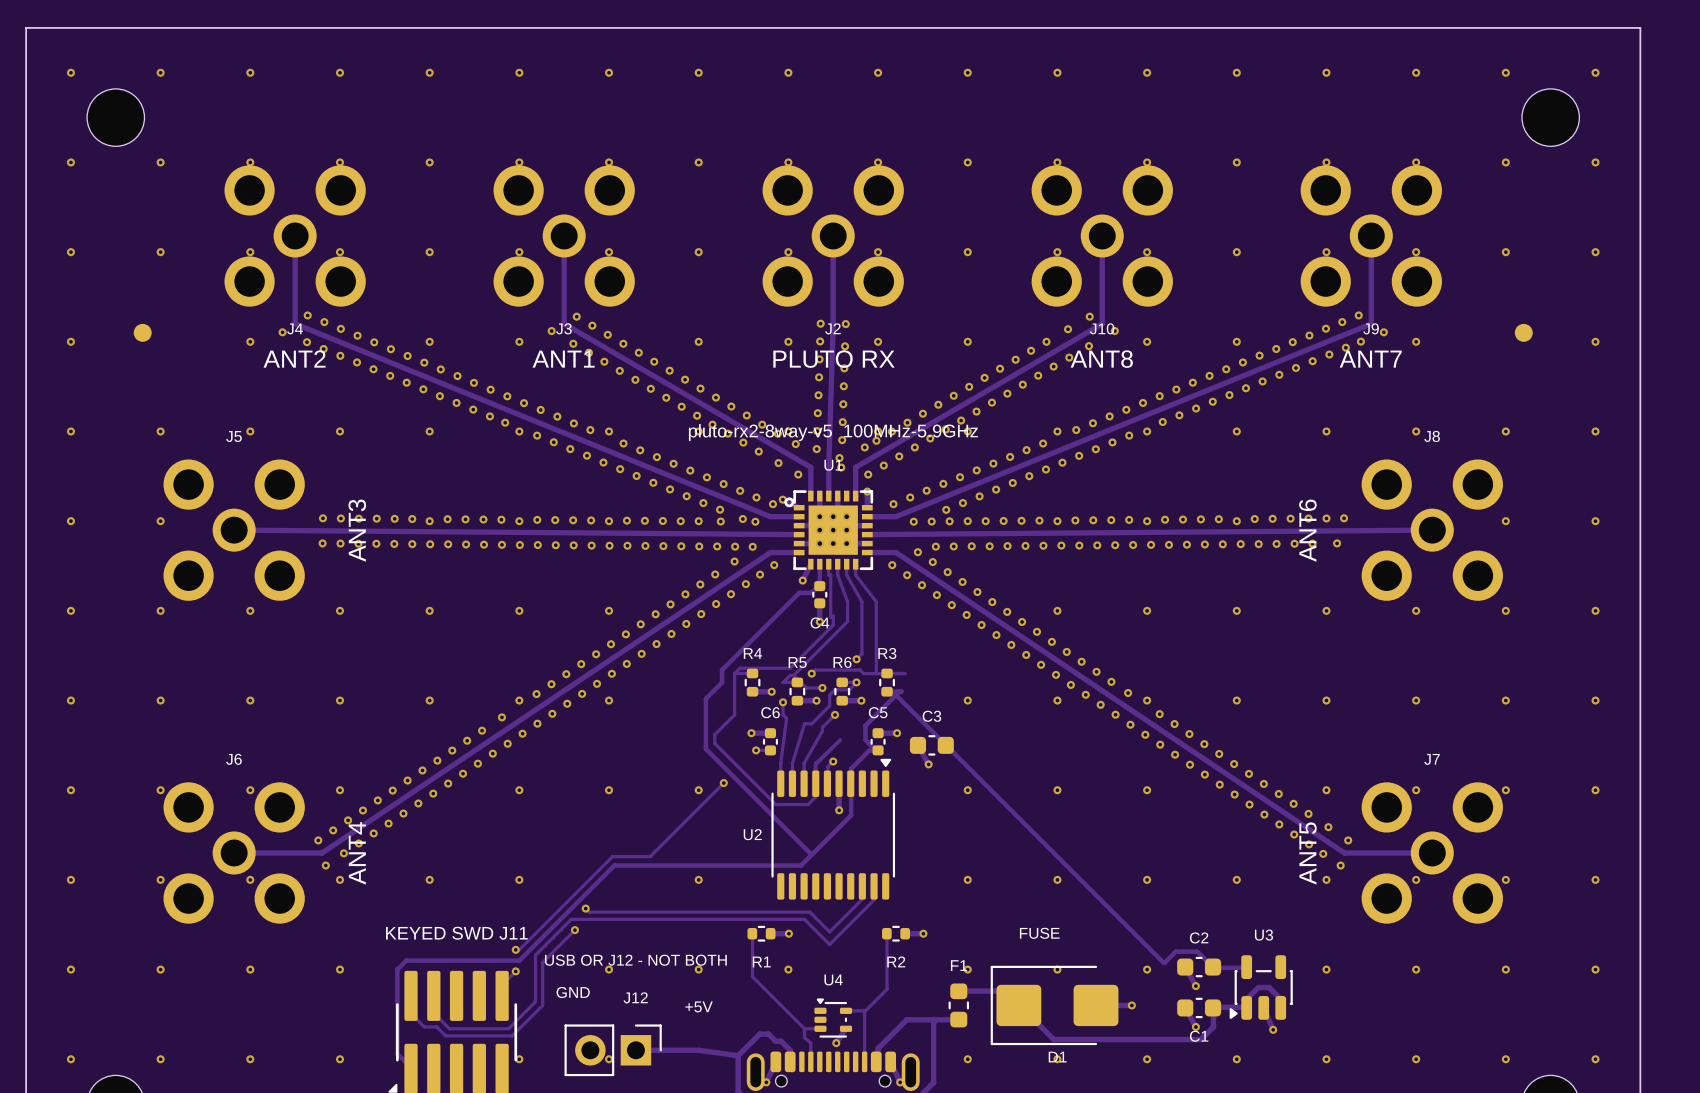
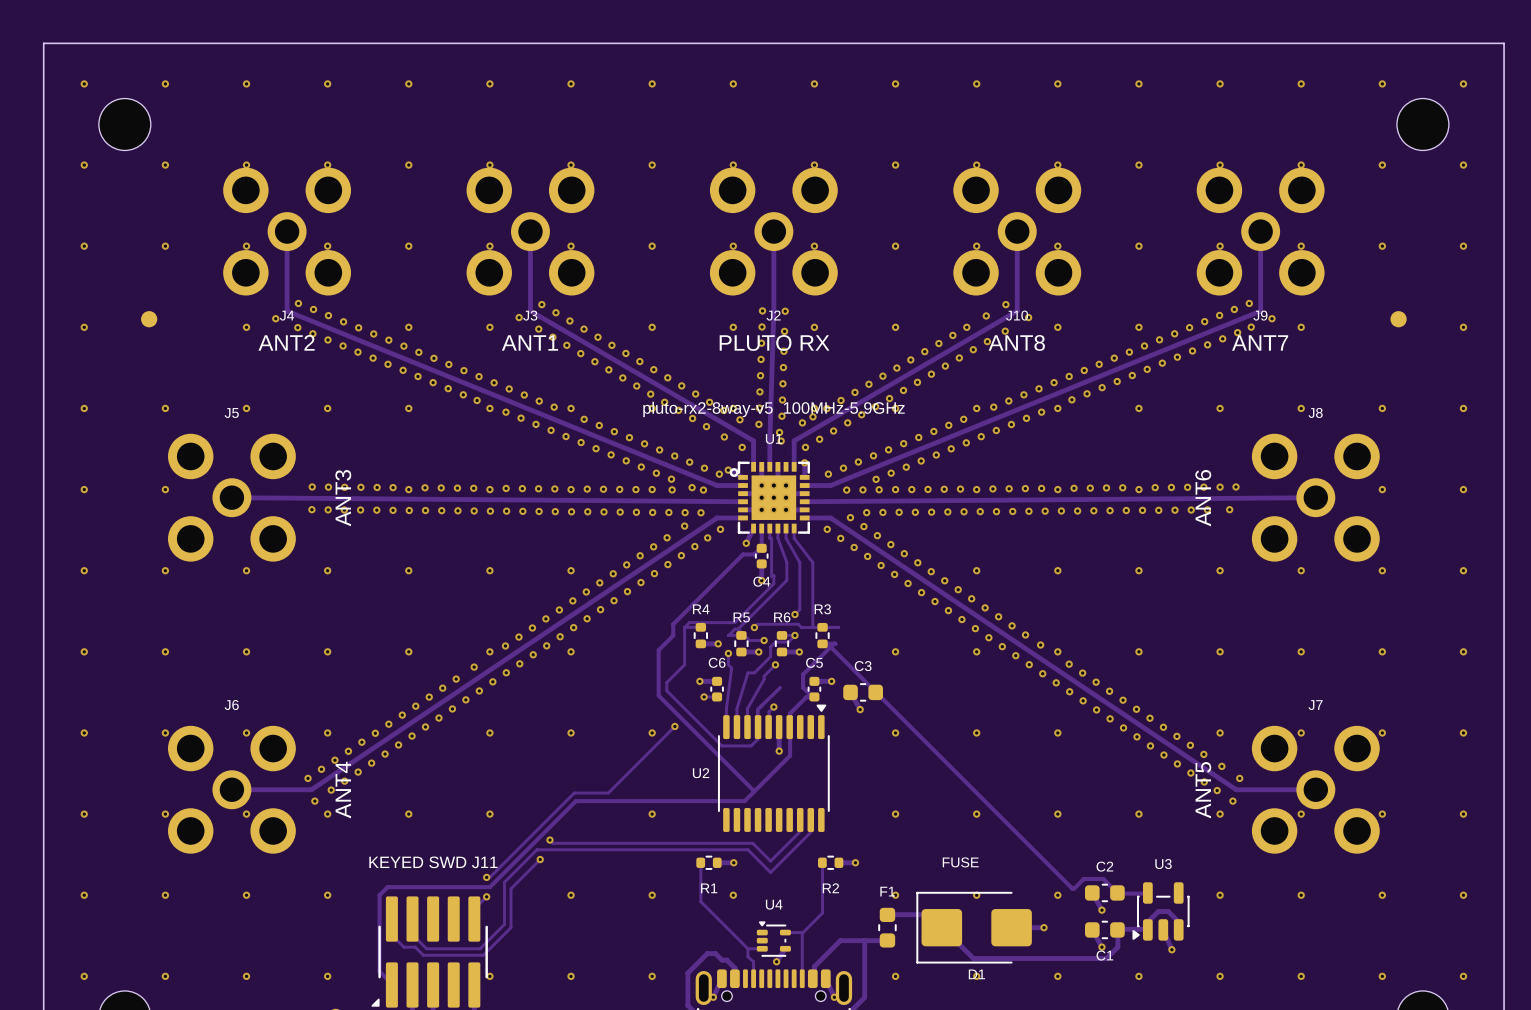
text: USB OR J12 - NOT BOTH (635, 960) -> none
text: GND (573, 992) -> none
text: +5V (699, 1006) -> none
J12: (613, 1050) -> none
track: (635, 1050) (698, 1050) (738, 1055) -> none
via: none -> (652, 976)

